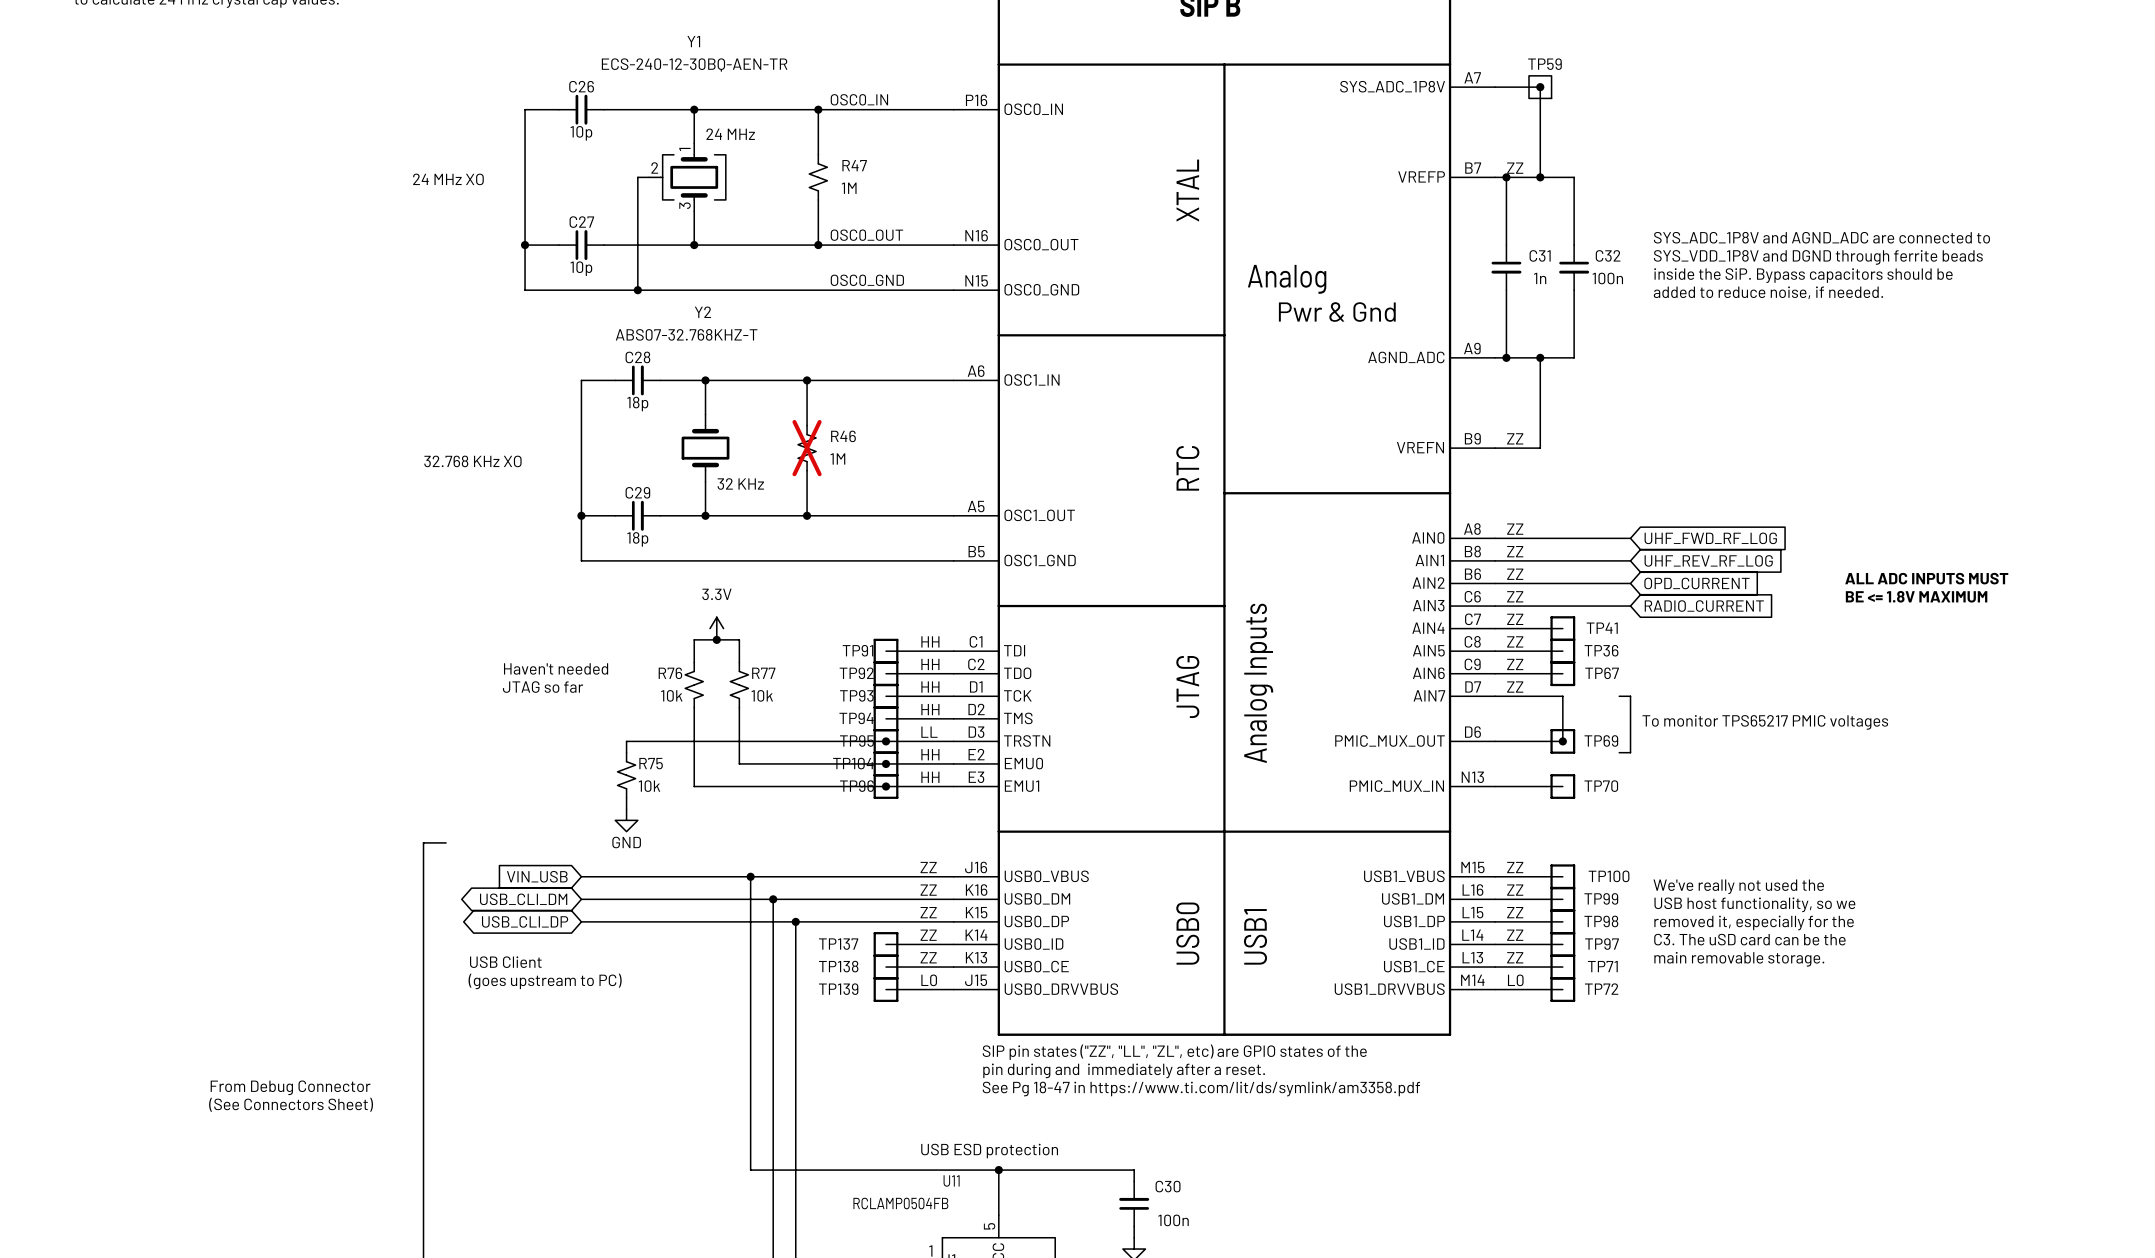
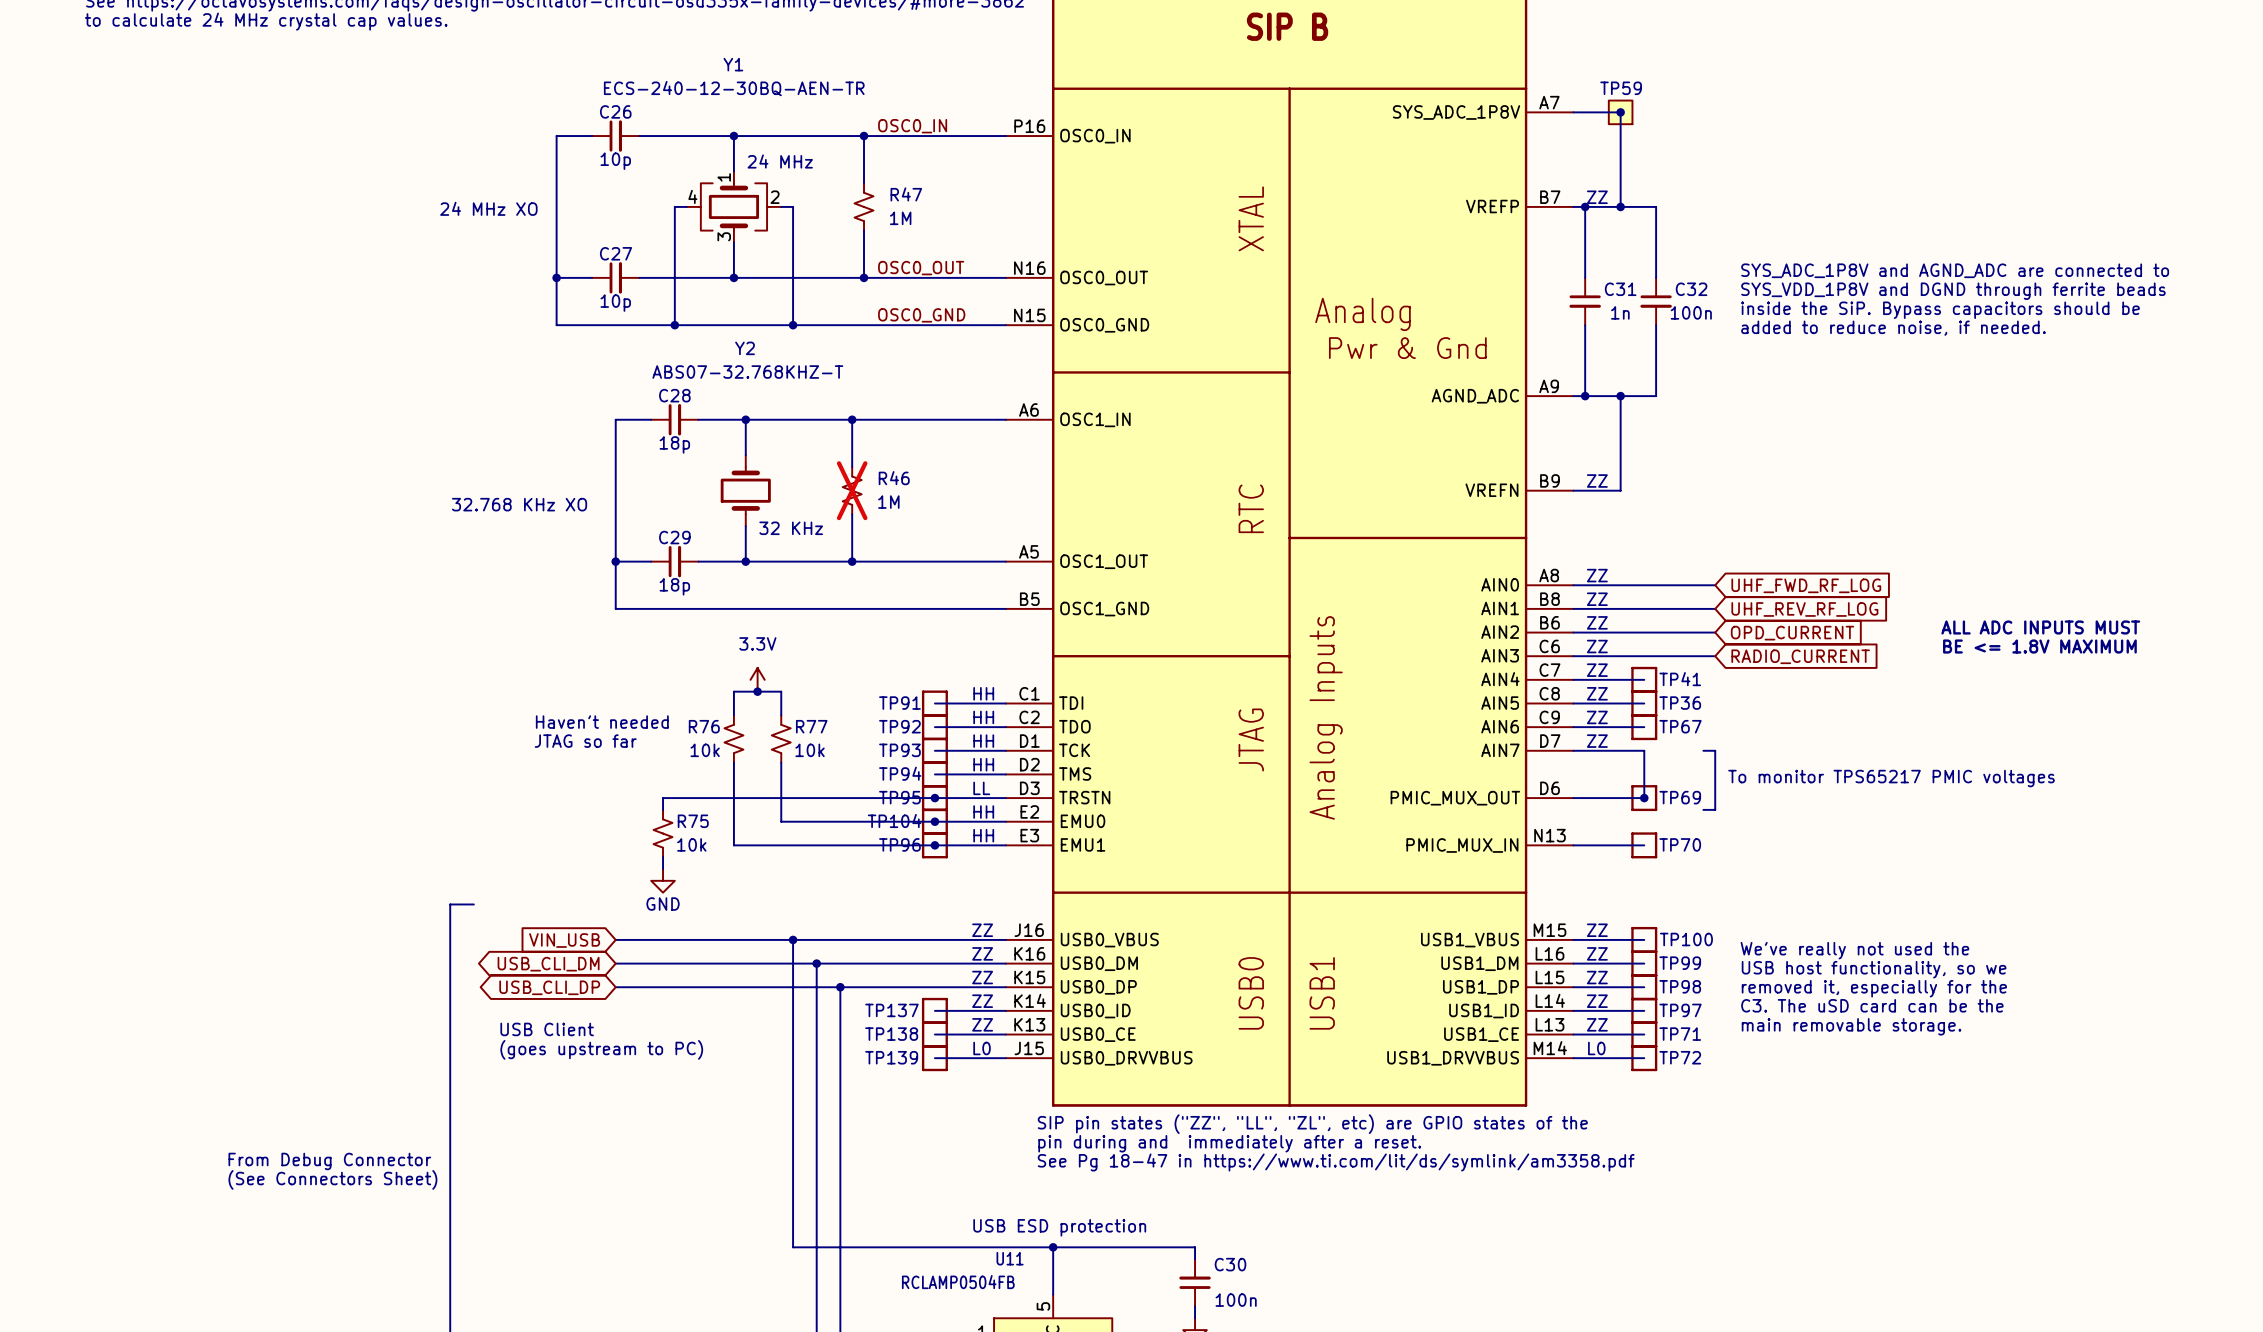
Y1 symbol: [649, 143, 726, 212] -> [686, 171, 782, 243]
wire: none -> (781, 206) (793, 206) (793, 325)
junction: none -> (793, 325)

